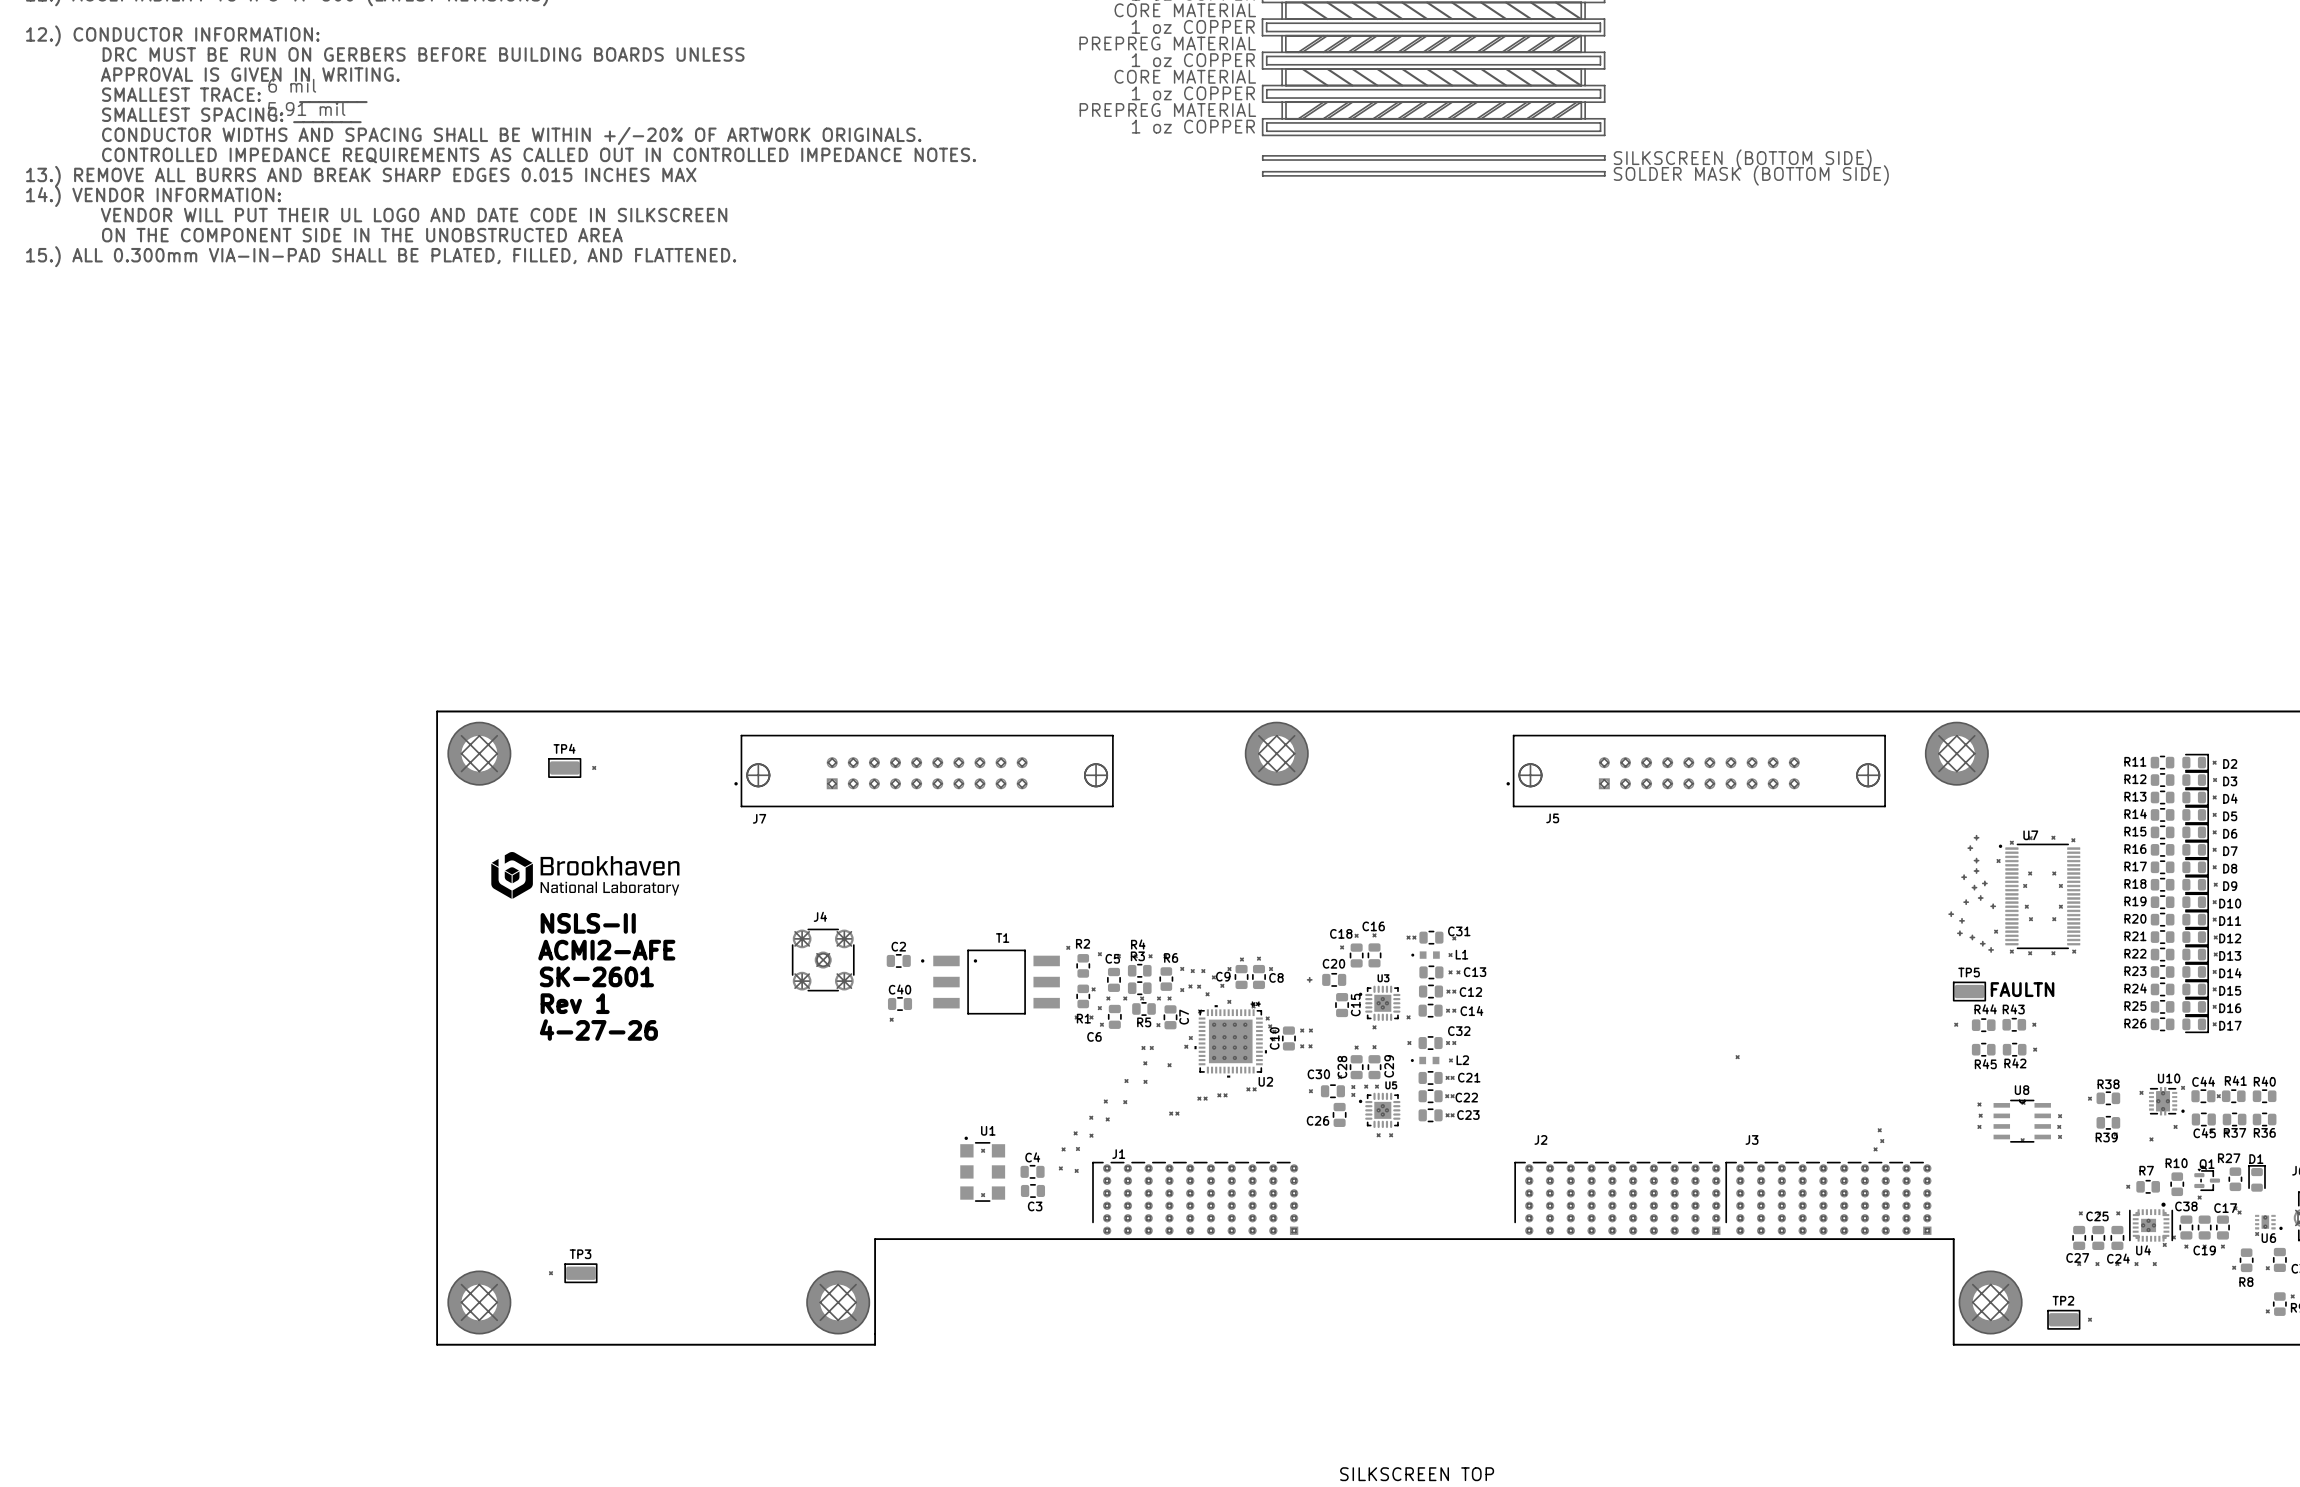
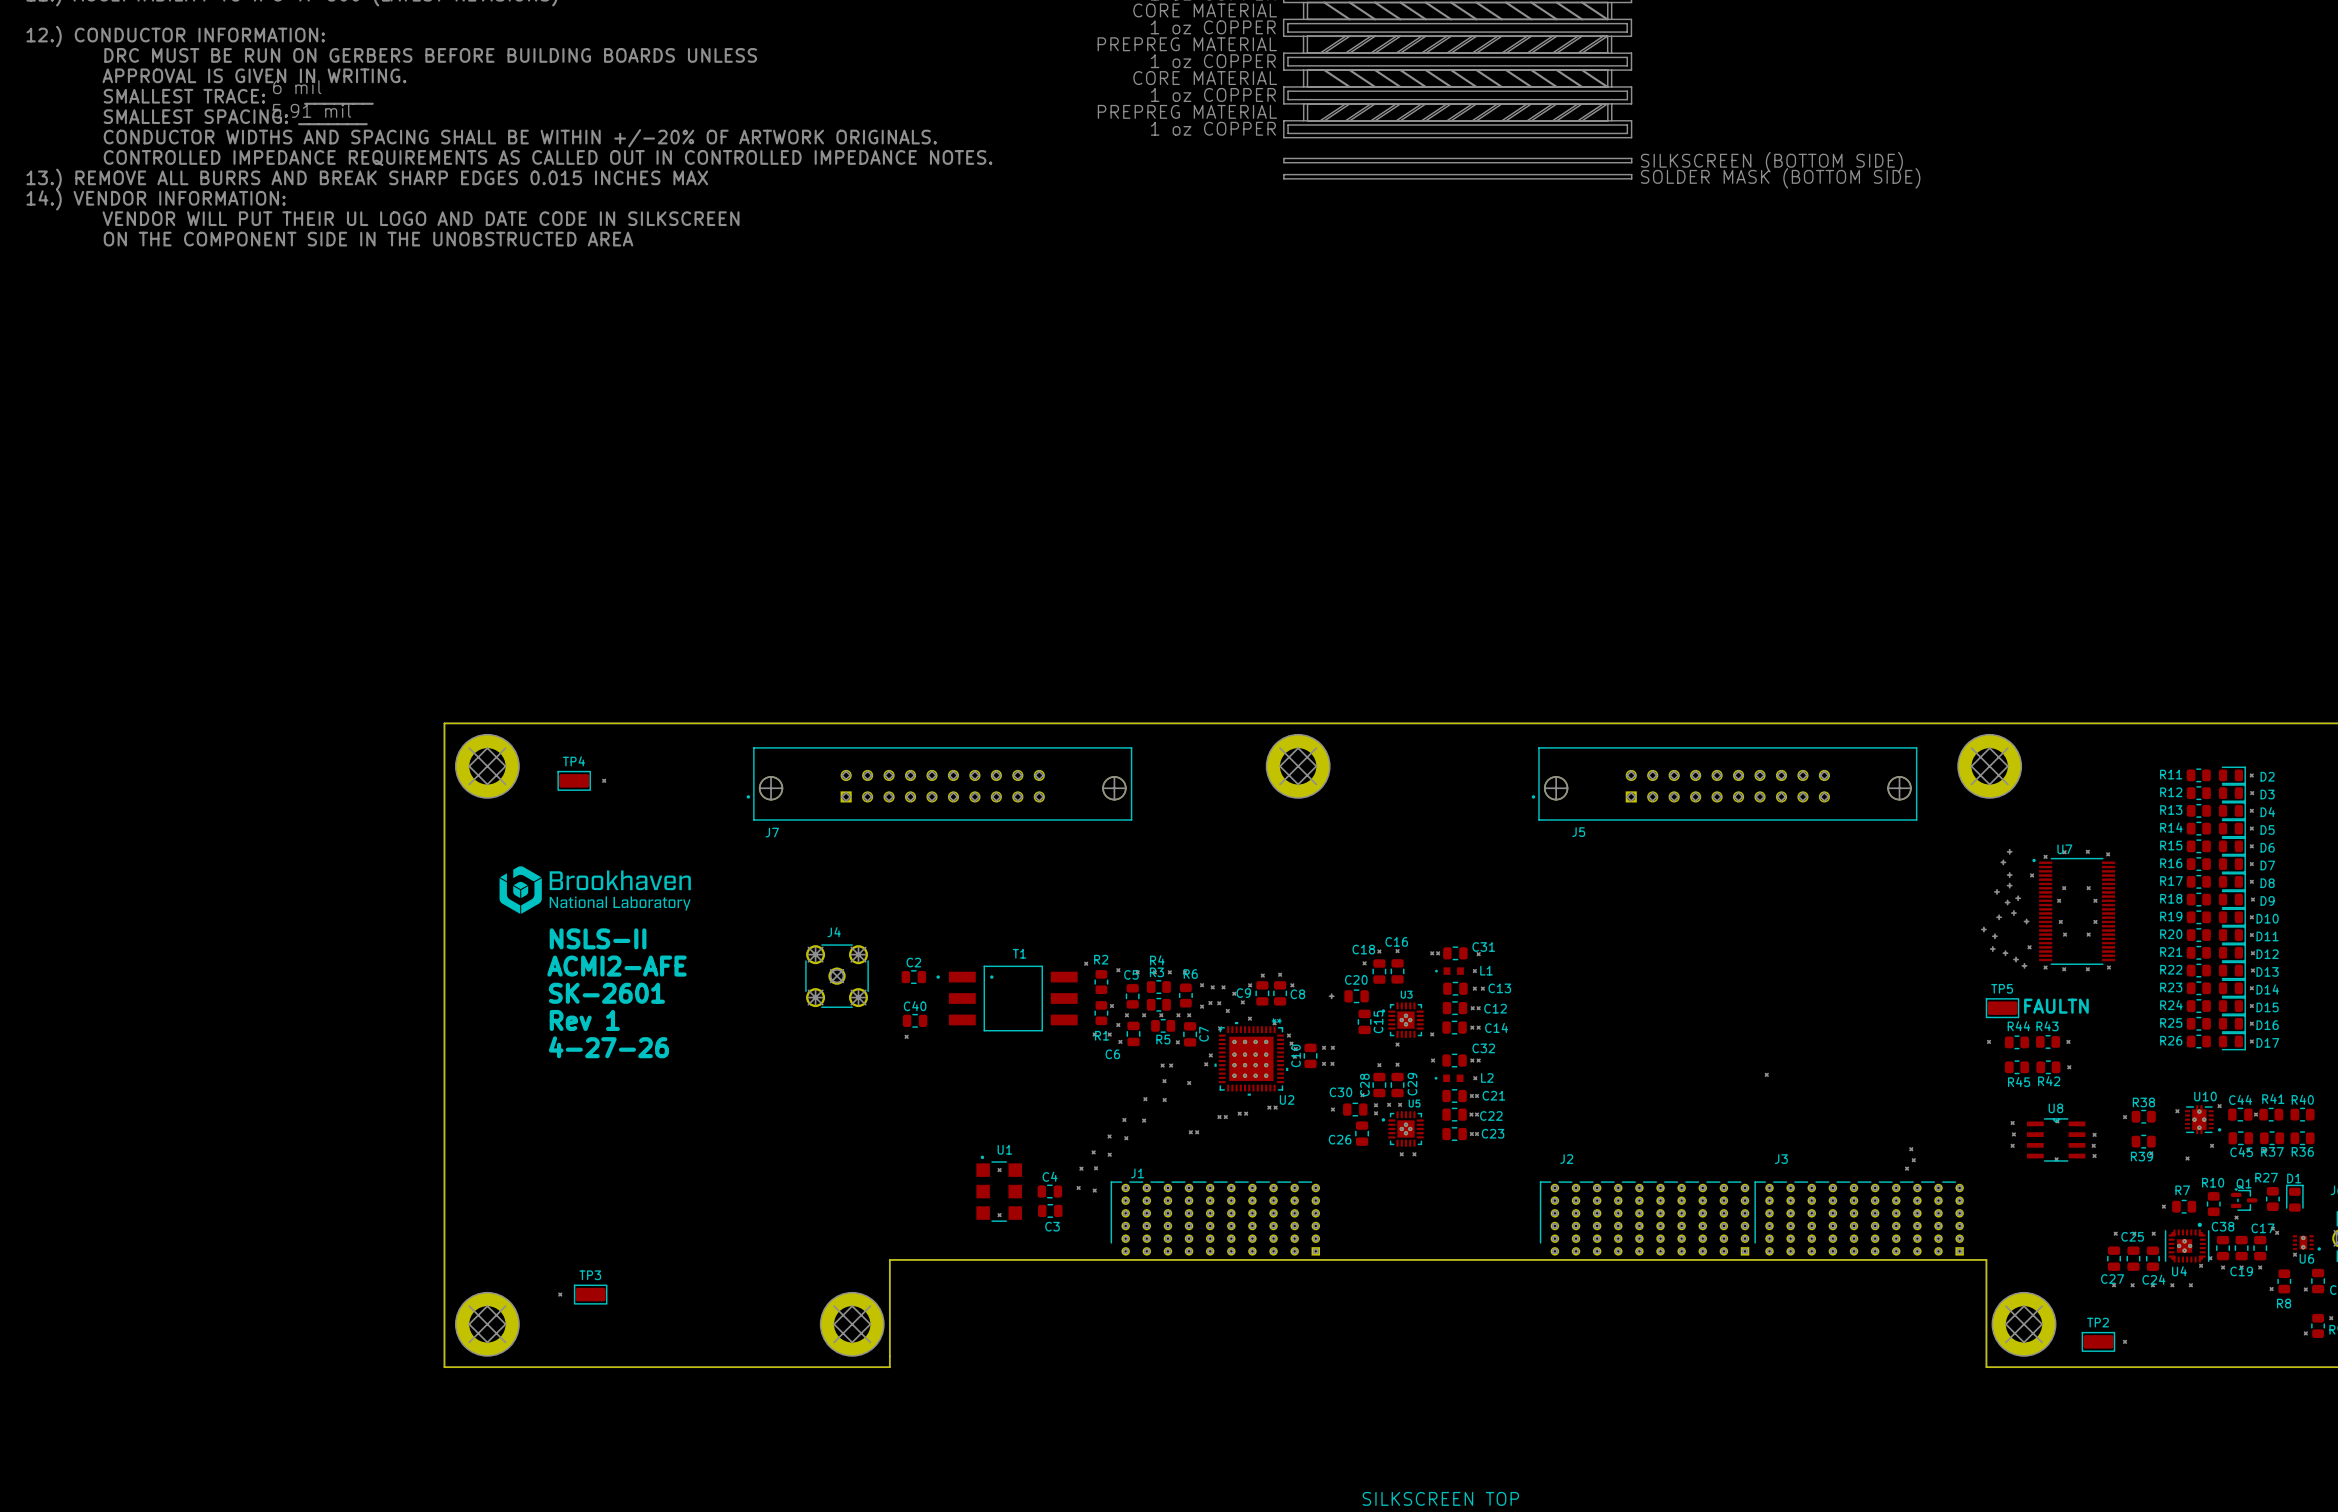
text: 15.) ALL 0.300mm VIA-IN-PAD SHALL BE PLATED, FILLED, AND FLATTENED. (381, 256) -> none

